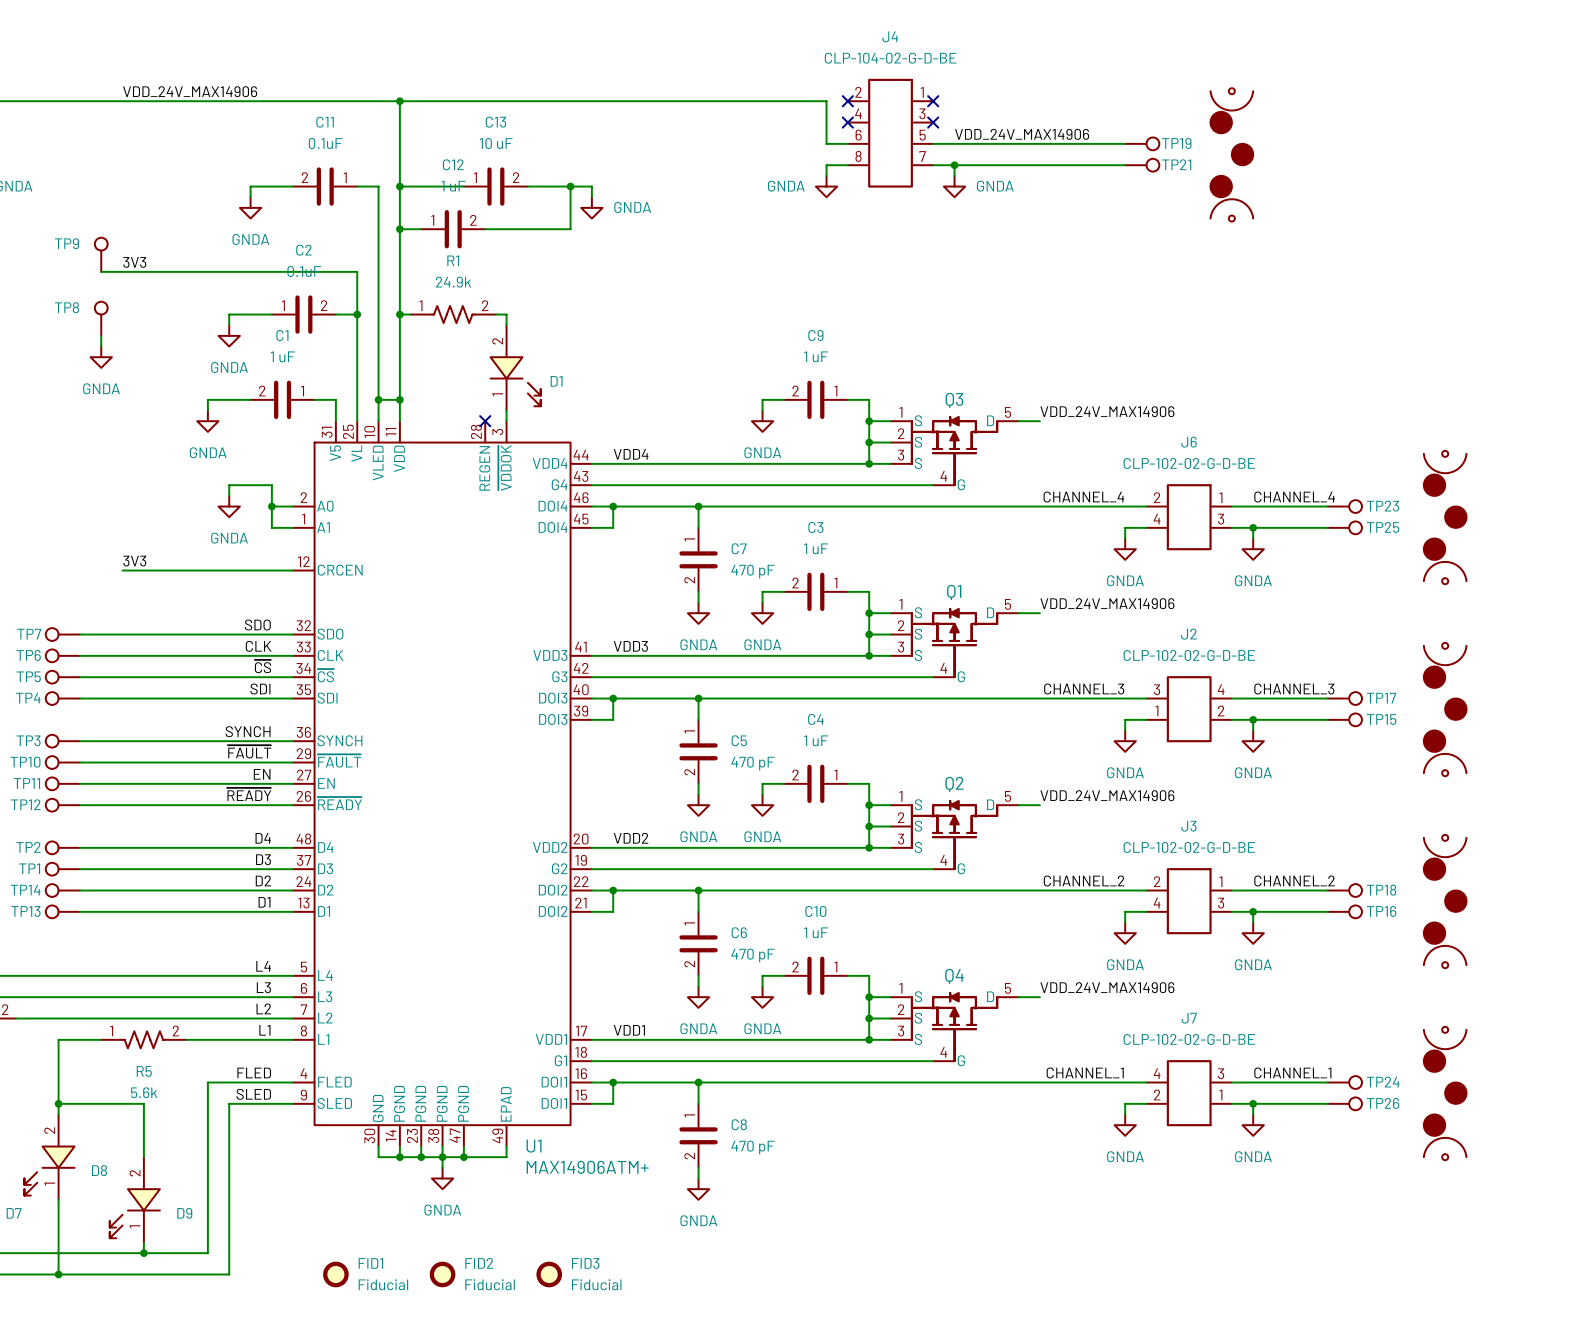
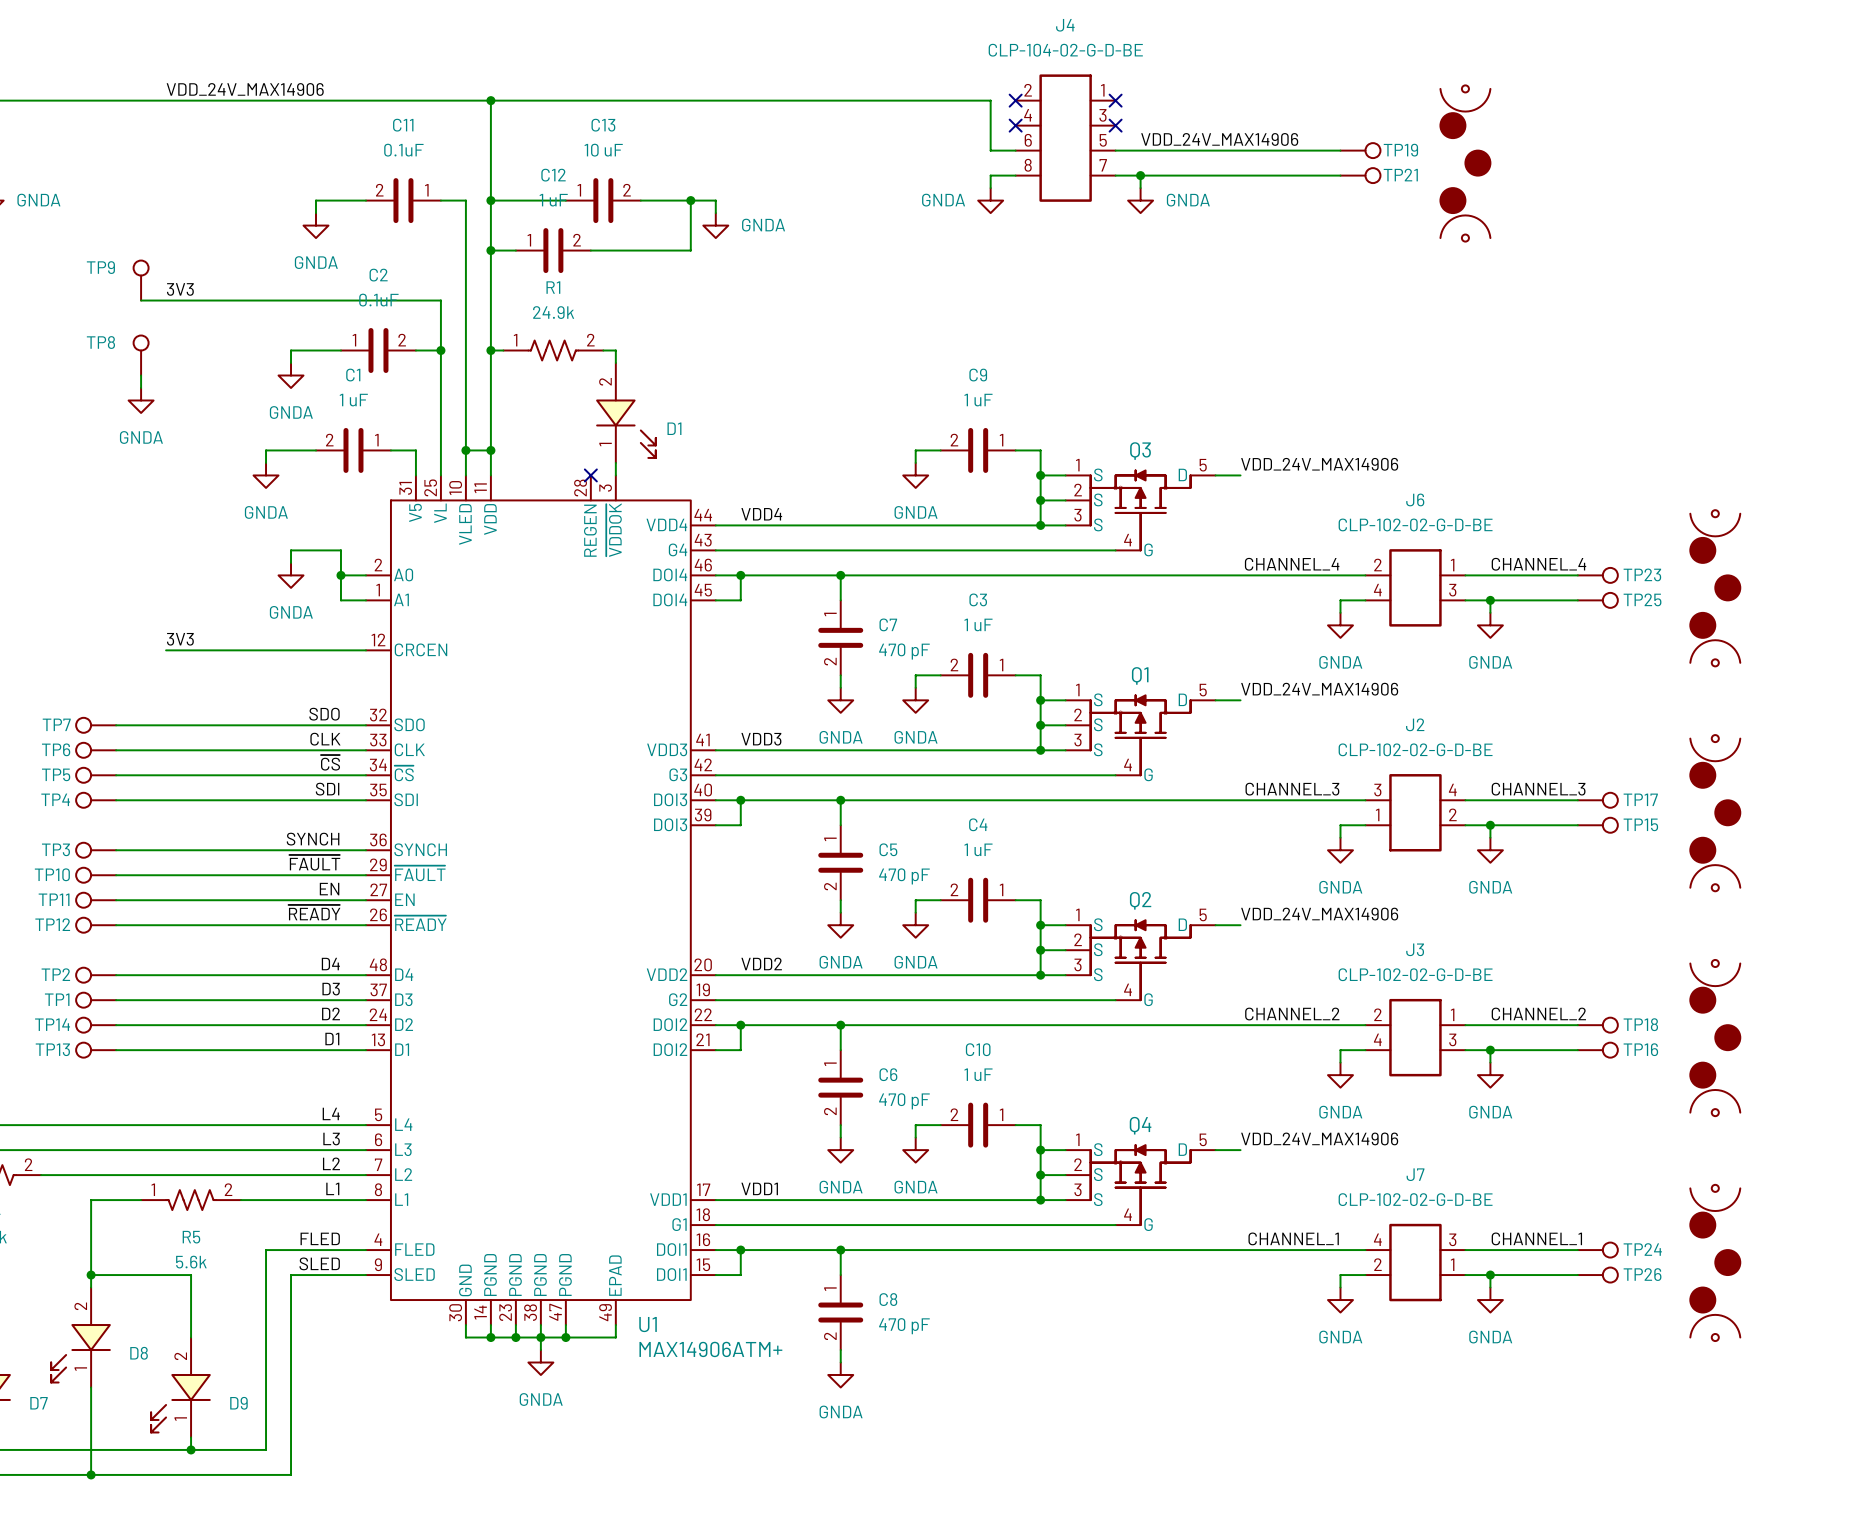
FID1: Fiducial (335, 1274) -> none
FID2: Fiducial (442, 1274) -> none
FID3: Fiducial (549, 1274) -> none

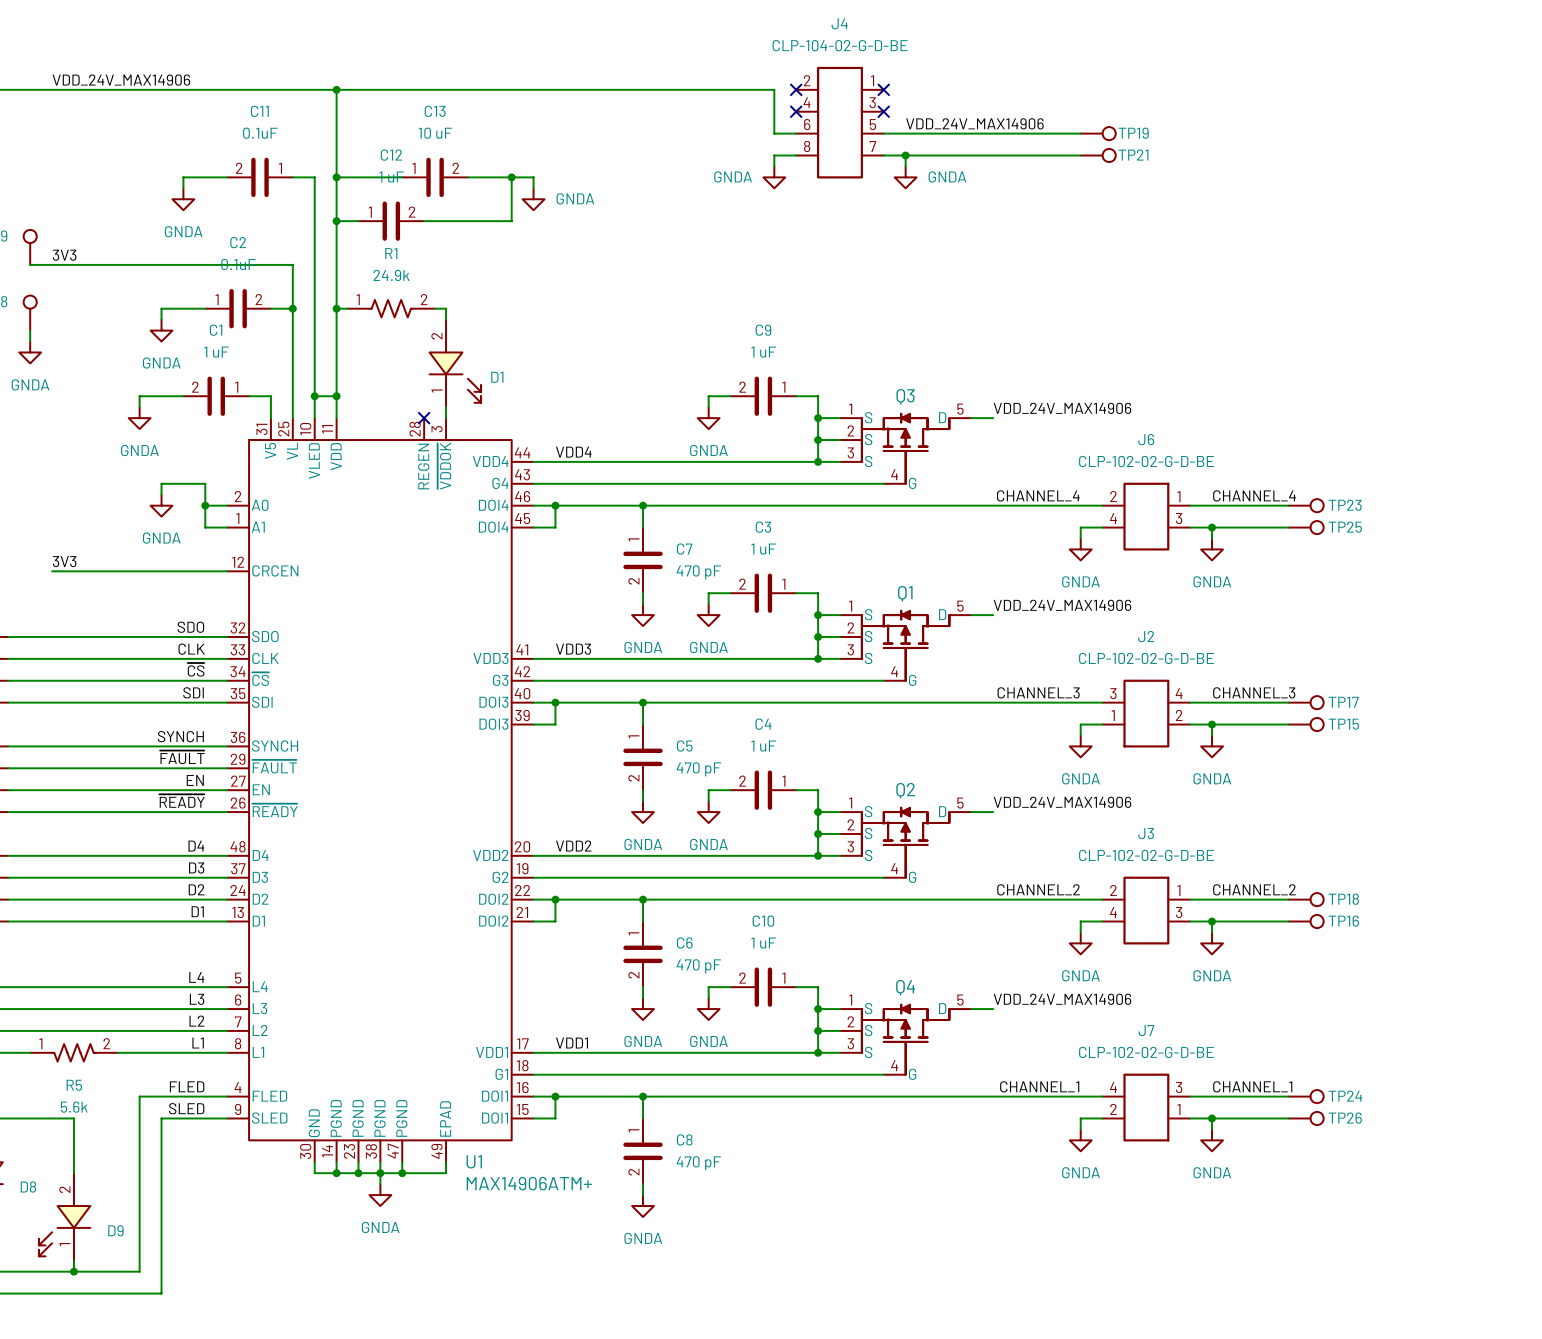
part: (1465, 163) -> none
part: (1715, 588) -> none
part: (1715, 813) -> none
part: (1715, 1038) -> none
part: (1715, 1262) -> none

